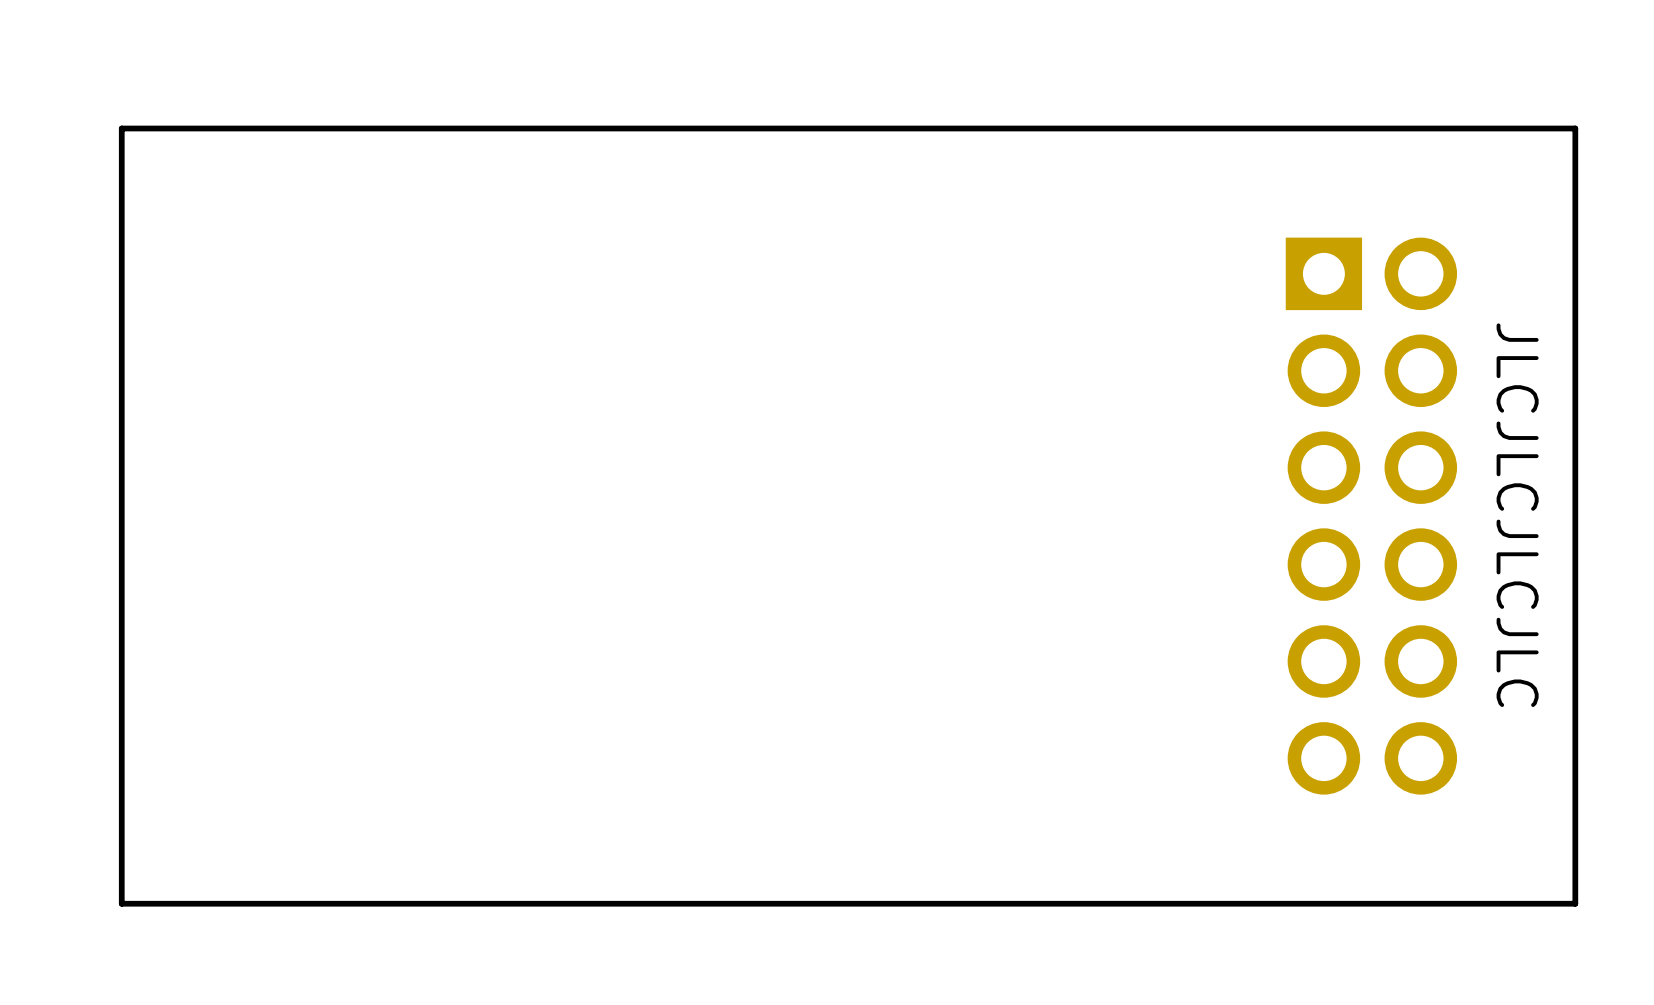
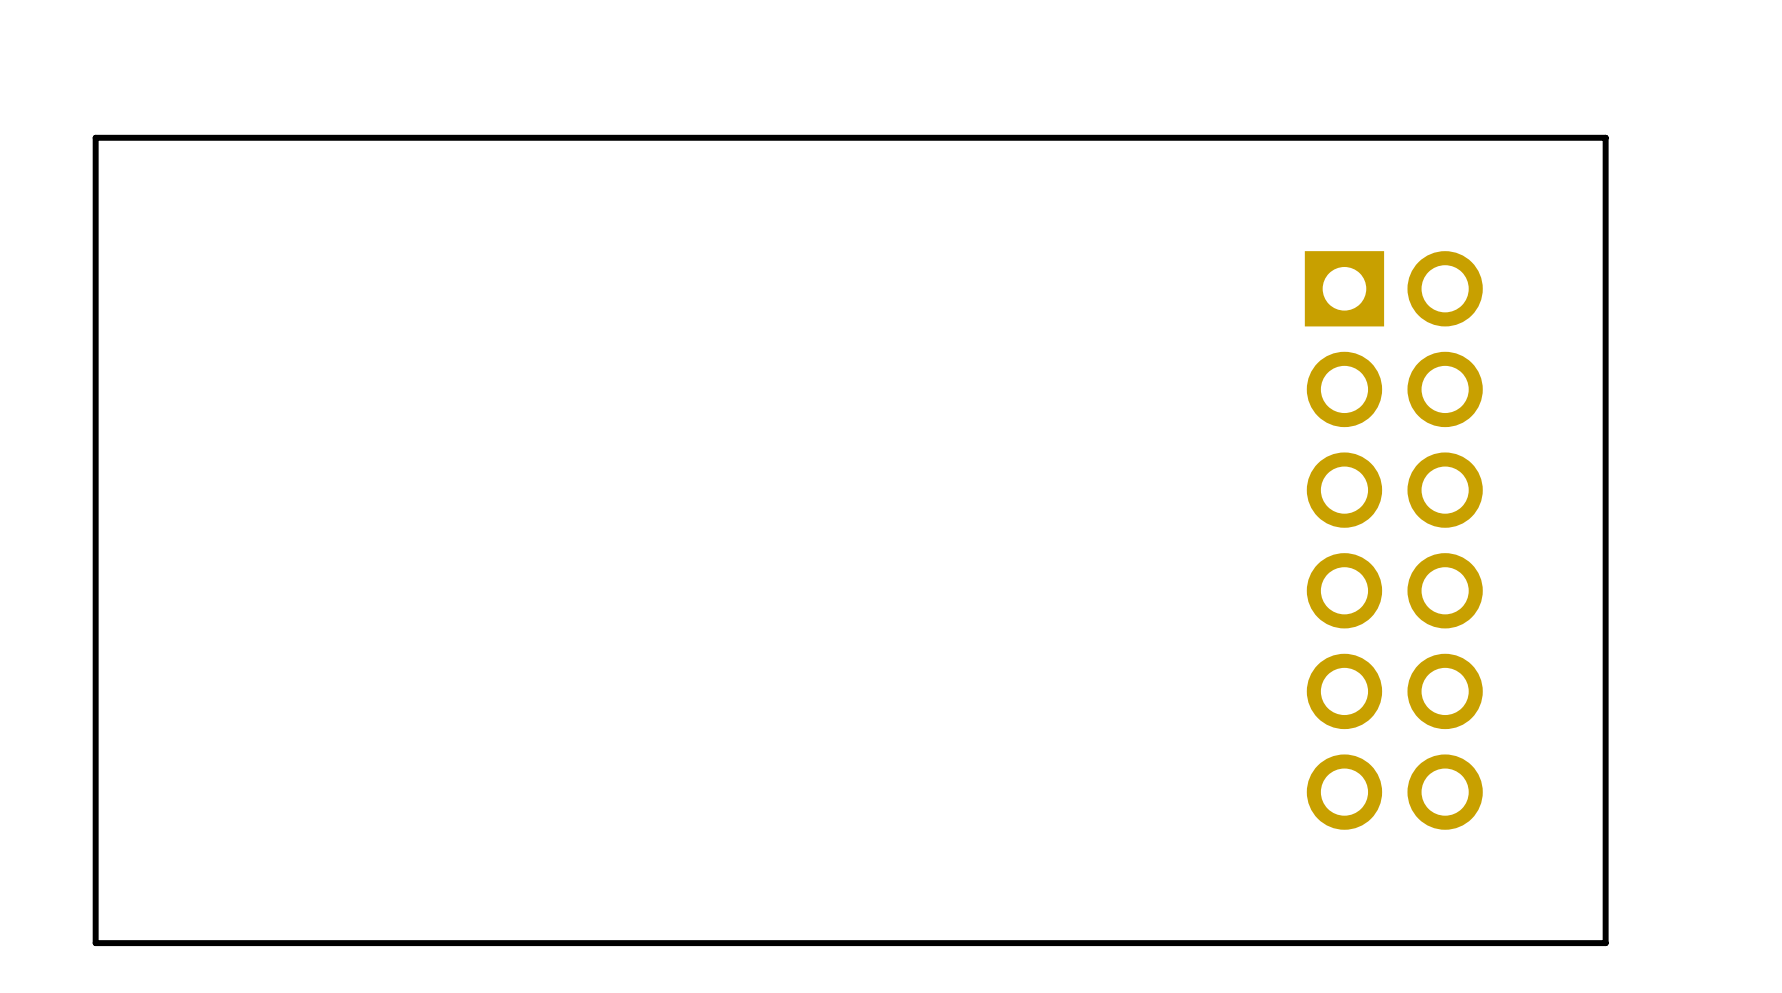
text: JLCJLCJLCJLC (1517, 515) -> none

